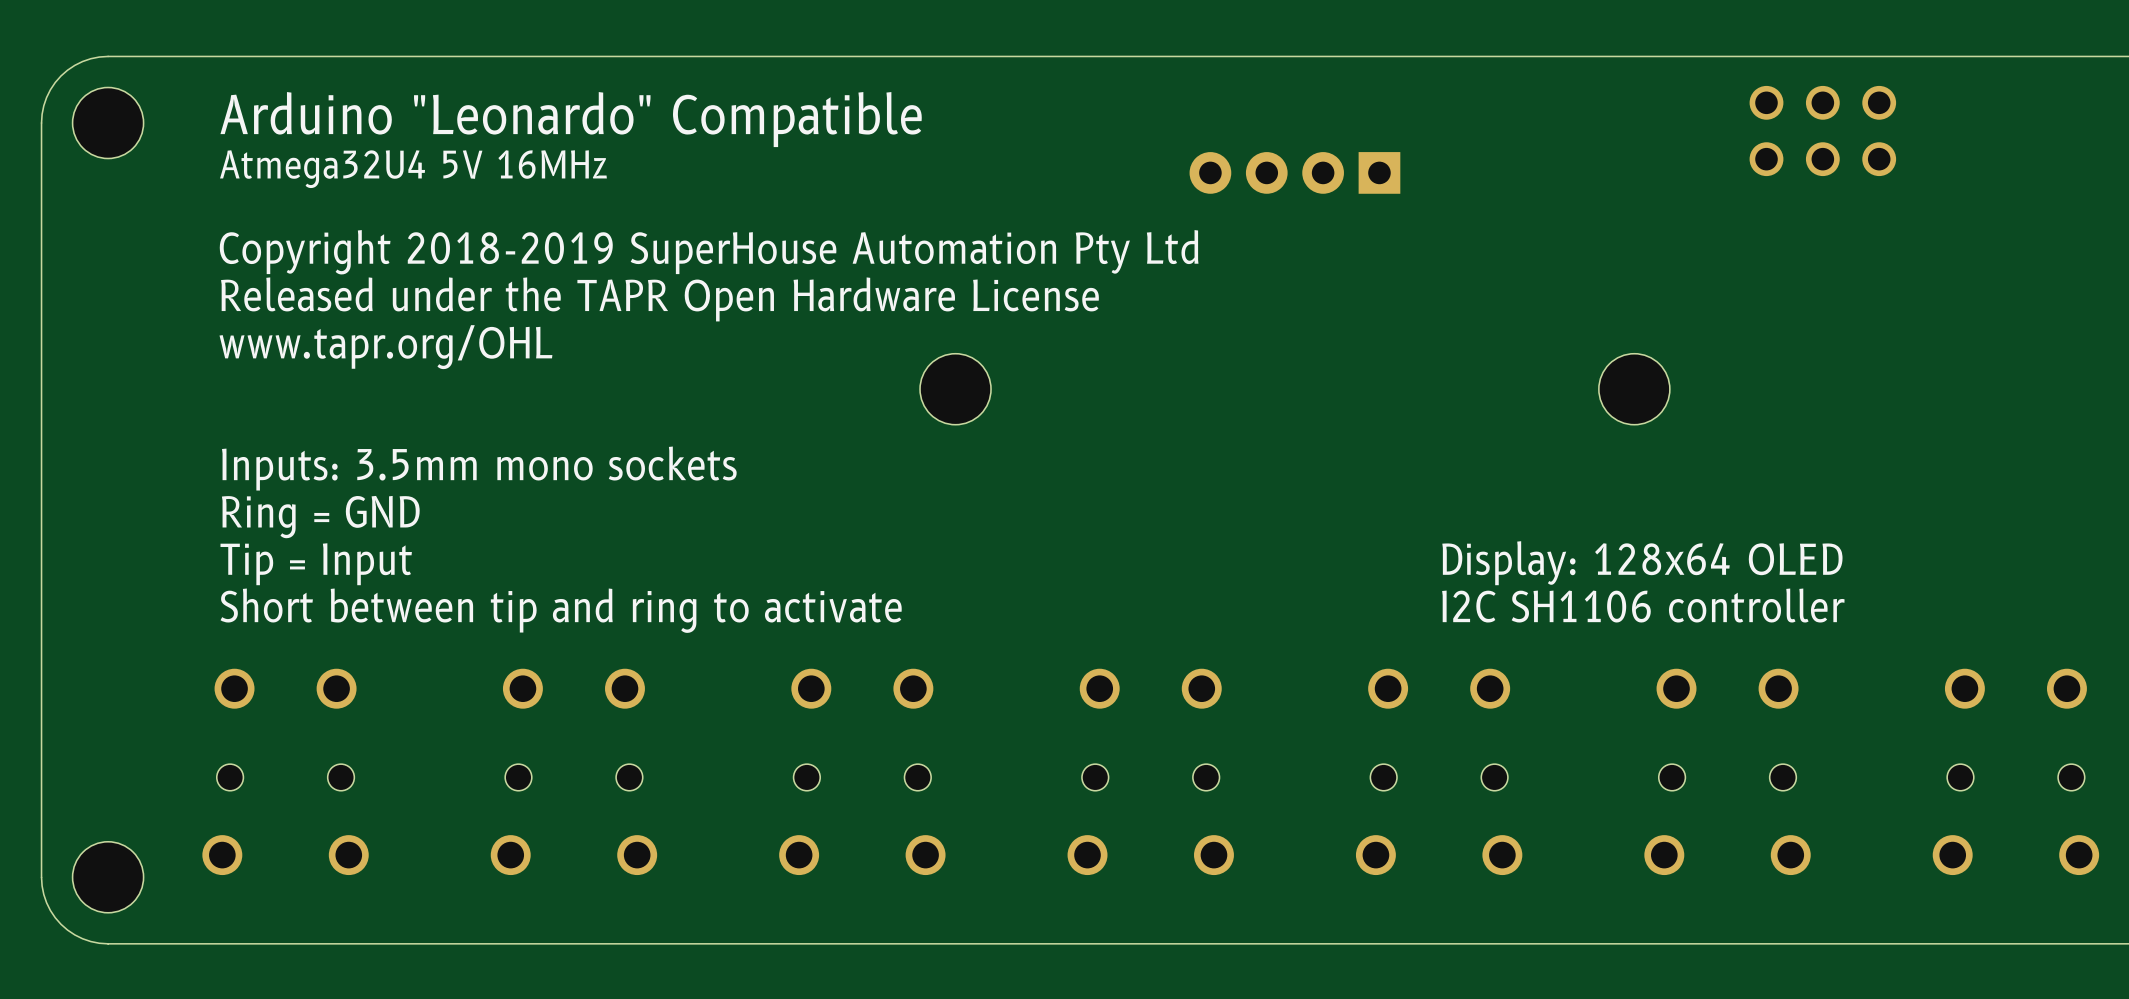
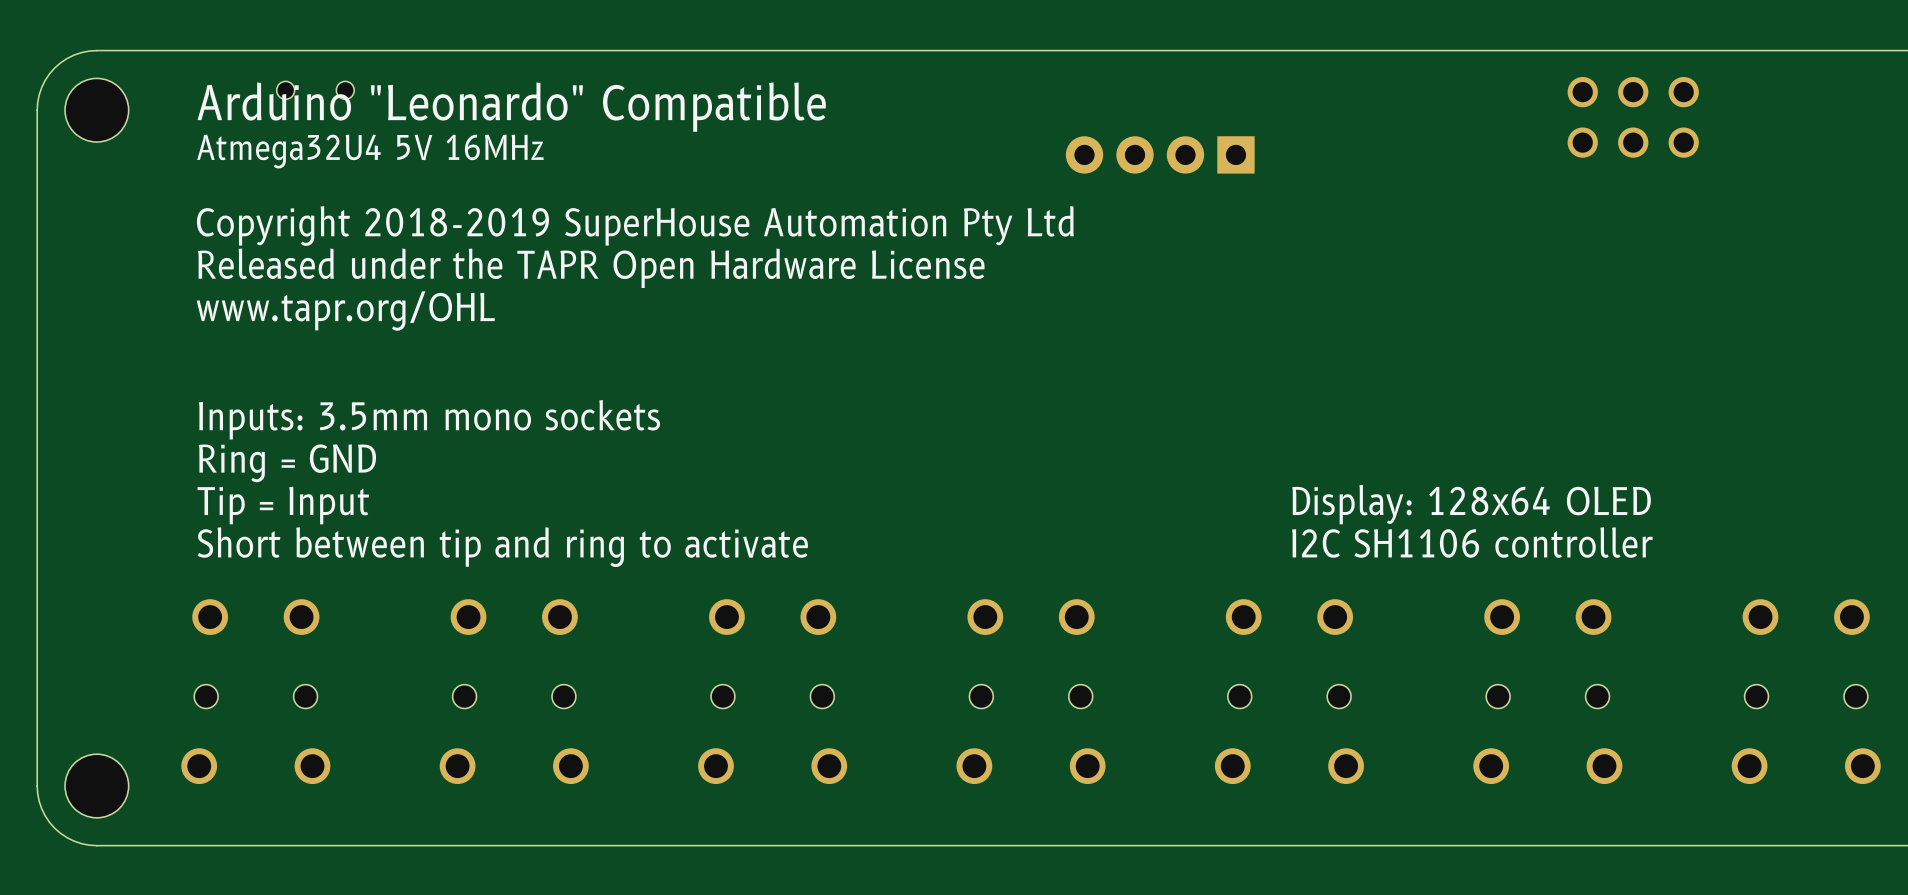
part: none -> (315, 90)
hole: (955, 389) -> none
hole: (1634, 389) -> none

